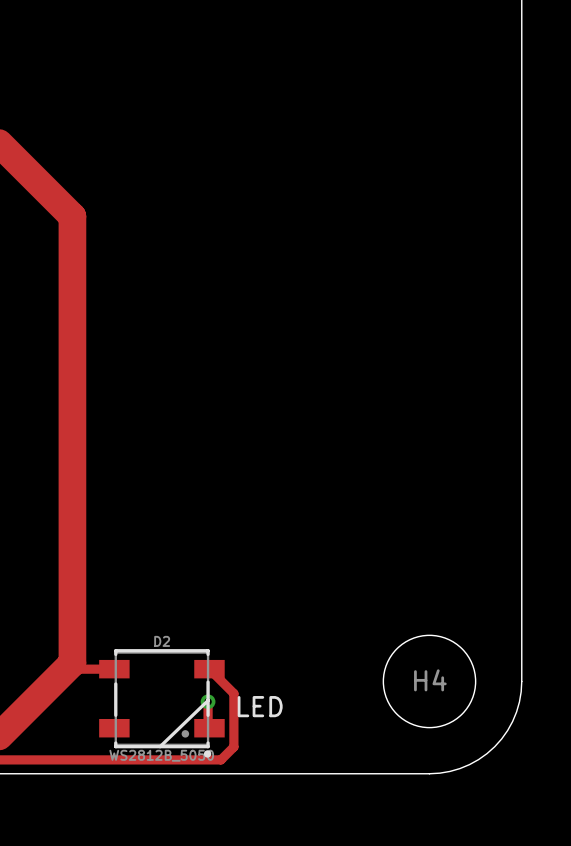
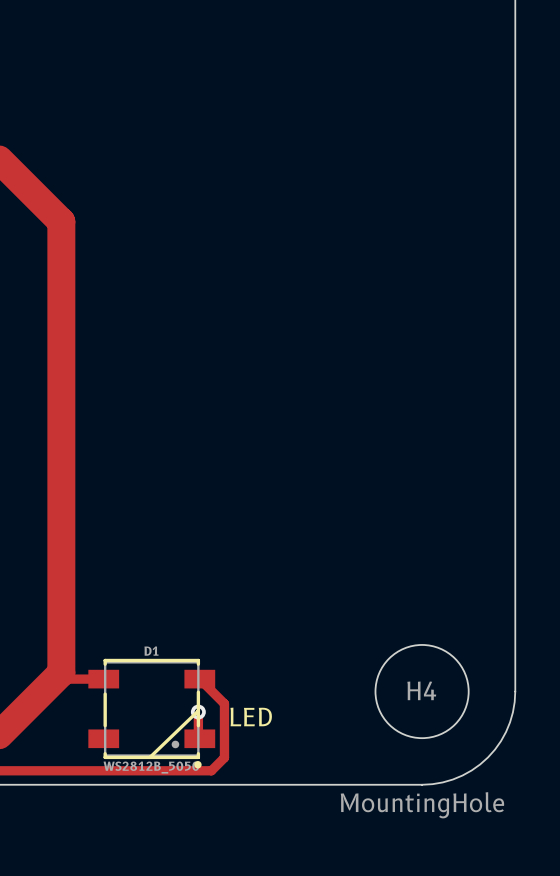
D2 name: D2 (162, 641) -> D1 (151, 651)
H4 value: none -> MountingHole (422, 805)

